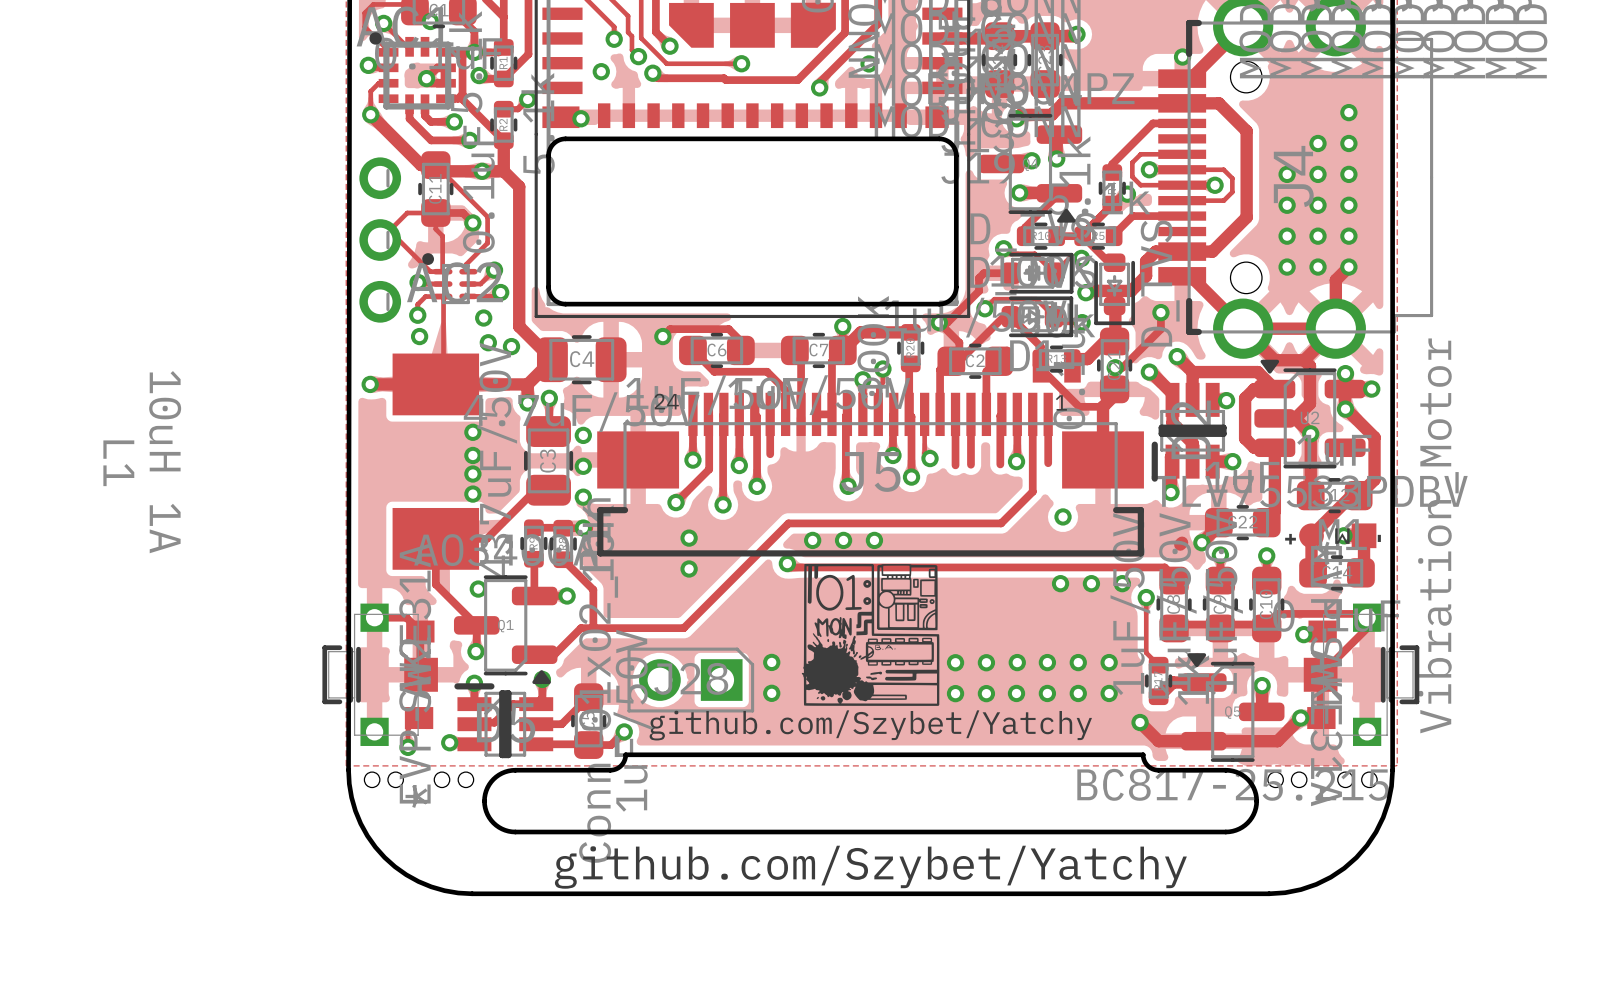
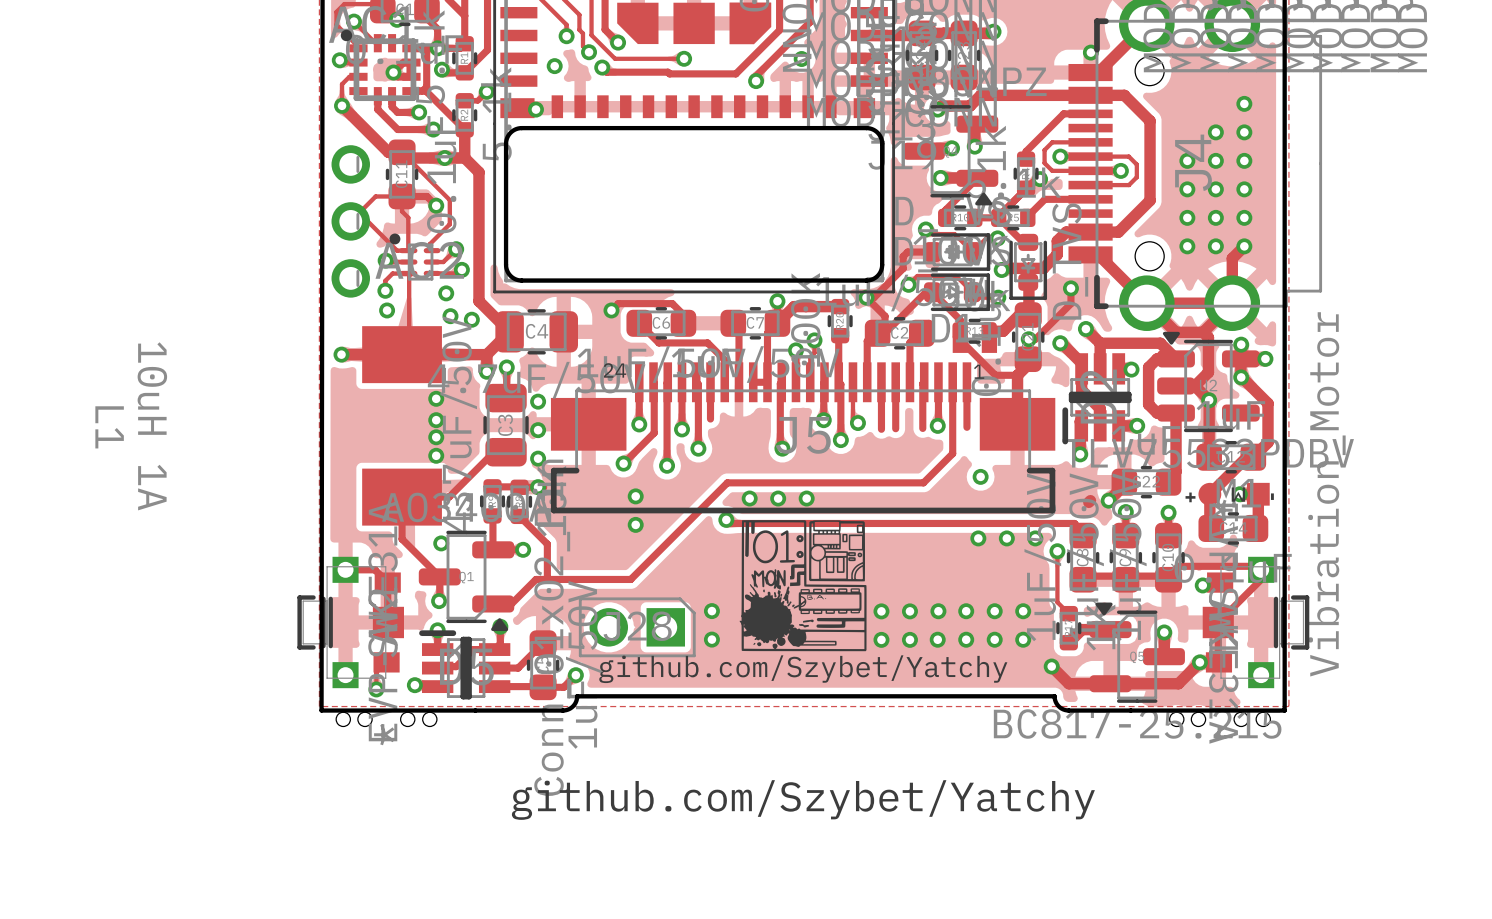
board edge: (348, 770) (351, 797) (360, 823) (367, 835) (384, 857) (395, 866) (418, 881) (444, 890) (472, 893) (1285, 892) (1316, 884) (1330, 877) (1344, 868) (1367, 845) (1376, 832) (1388, 802) (1392, 770) -> (1130, 710) (1284, 710)
board edge: (515, 770) (505, 771) (493, 779) (486, 790) (484, 801) (486, 811) (493, 822) (505, 830) (515, 832) (1229, 831) (1239, 828) (1249, 820) (1254, 811) (1256, 797) (1251, 784) (1245, 776) (1236, 771) (1225, 770) -> (475, 710) (321, 710)

